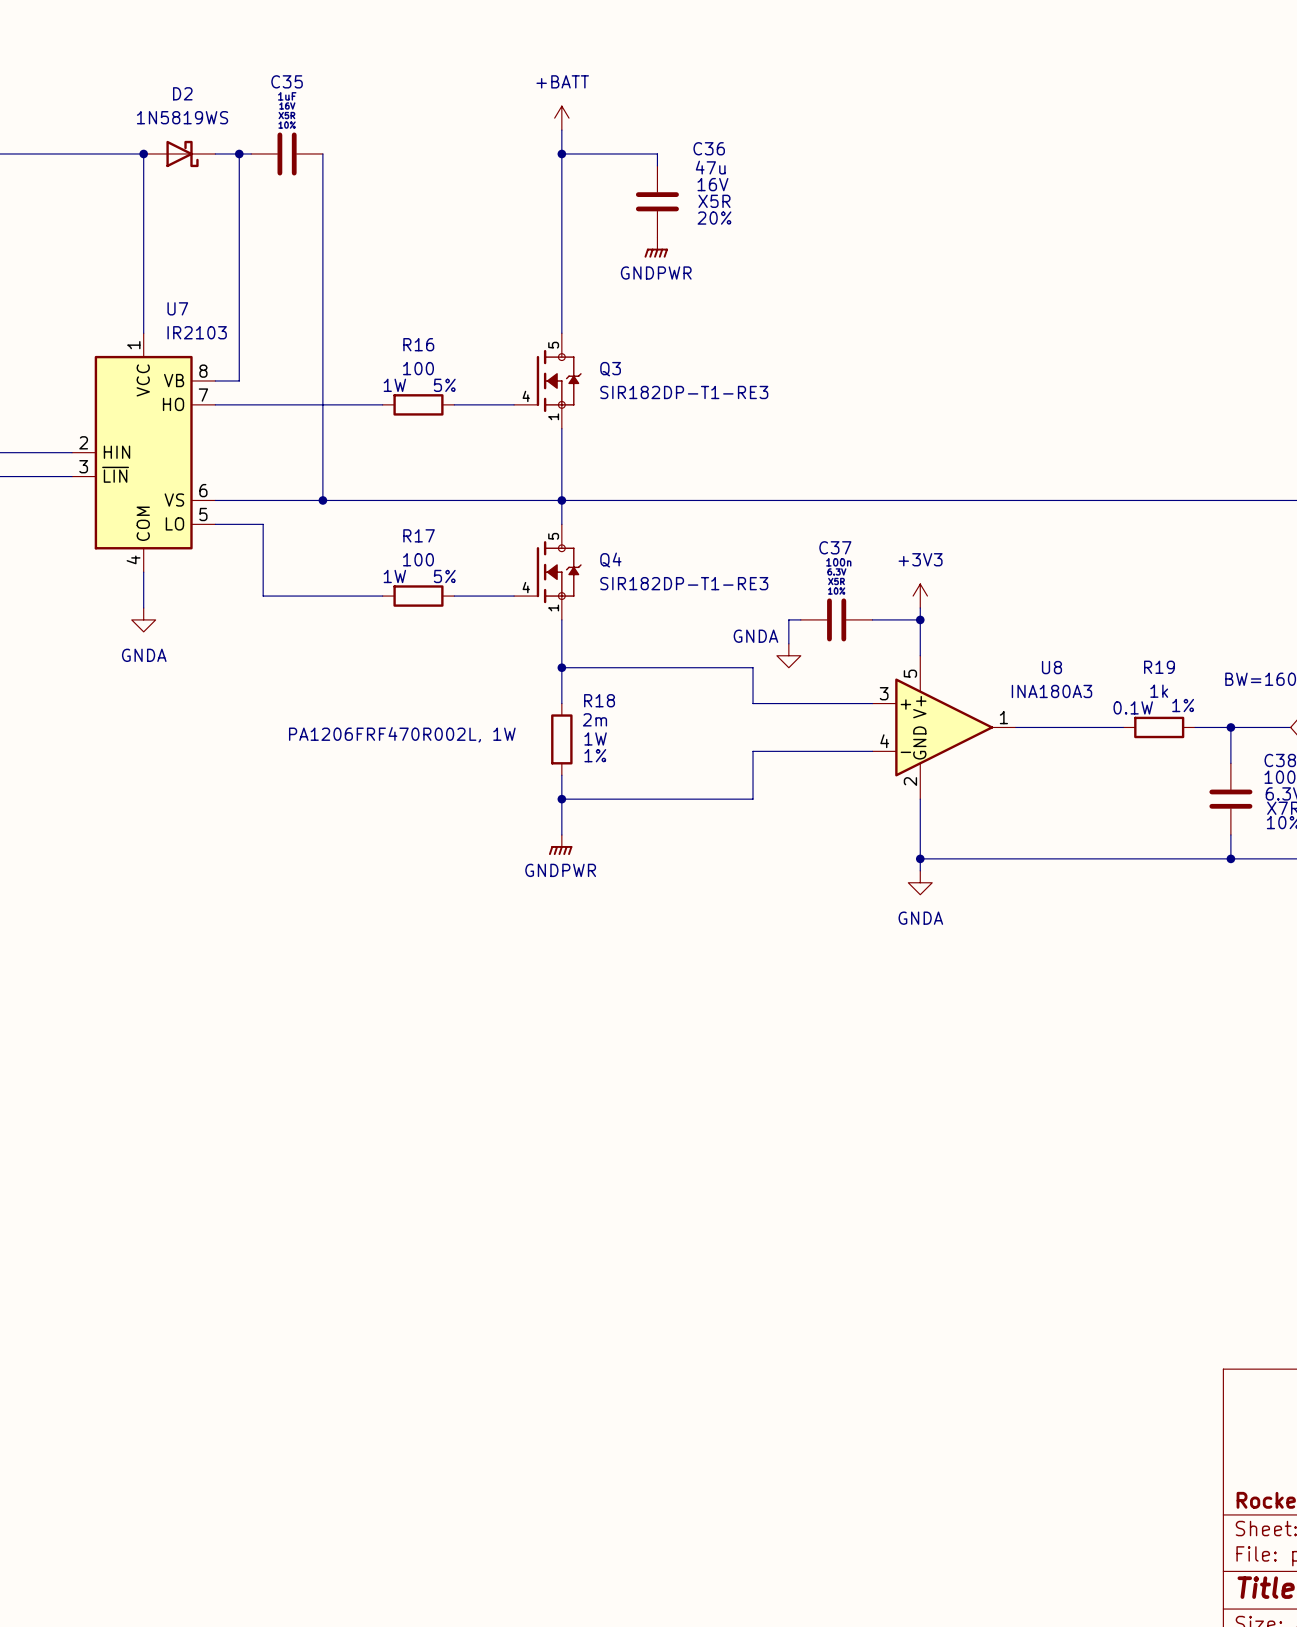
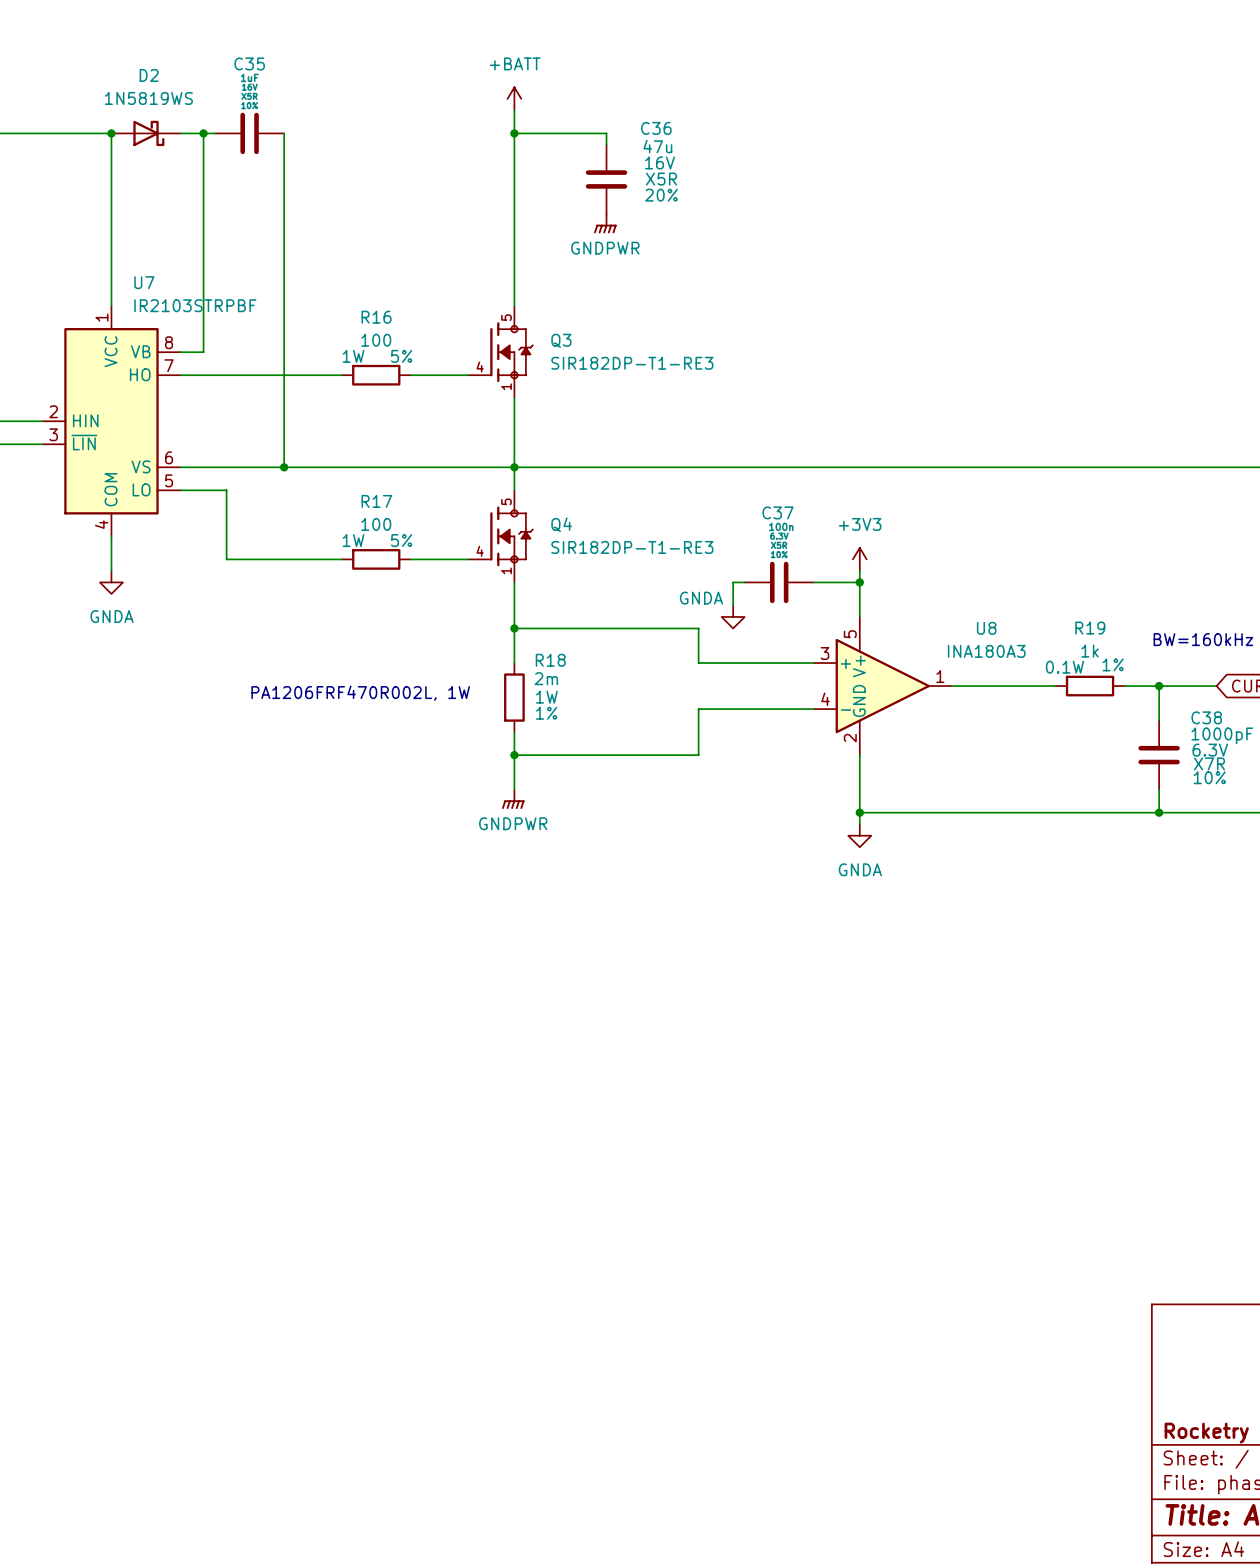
U7 value: IR2103 (197, 332) -> IR2103STRPBF (195, 305)

